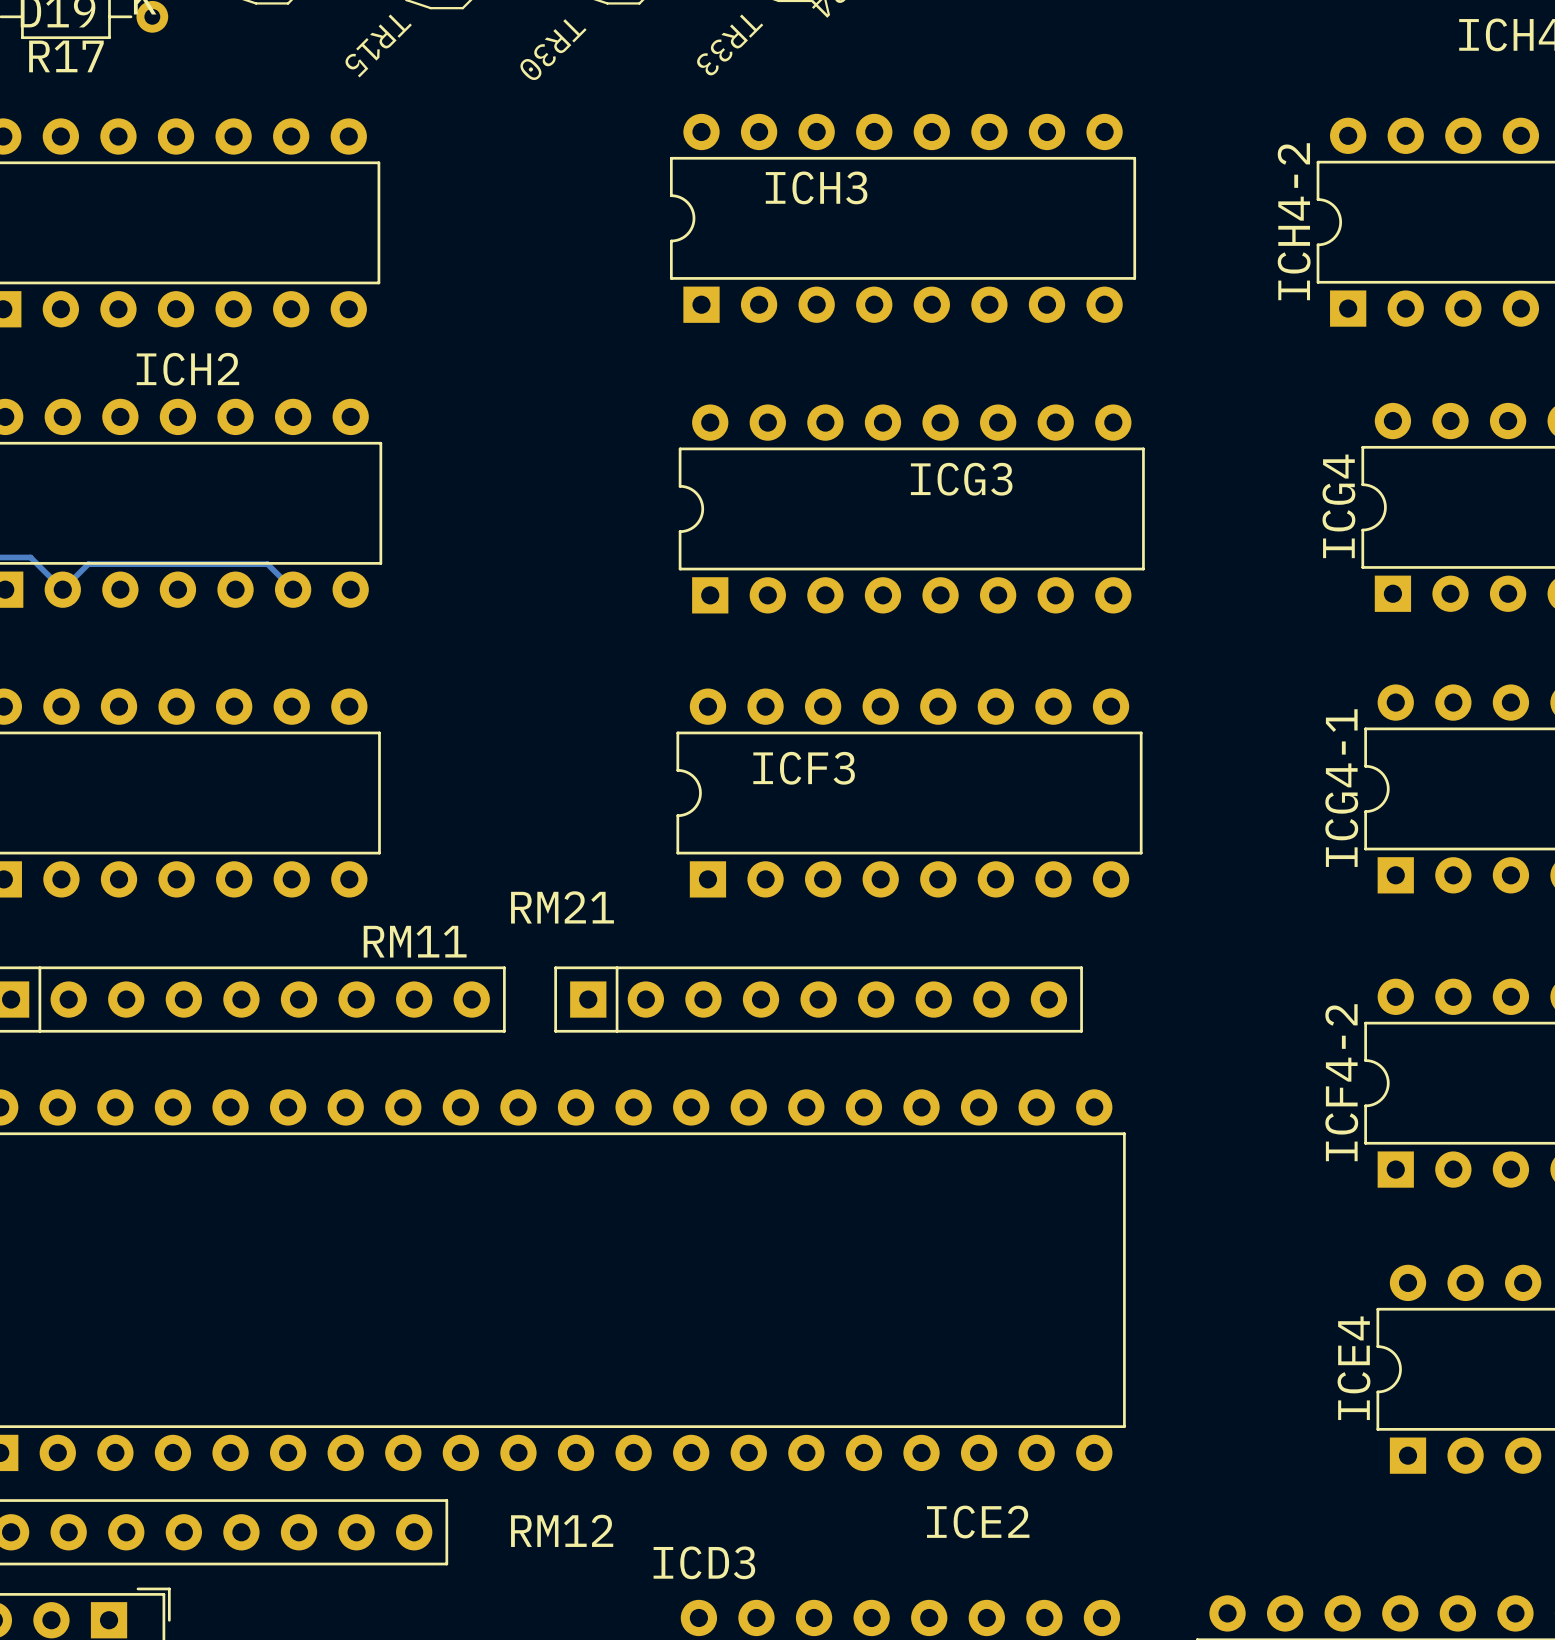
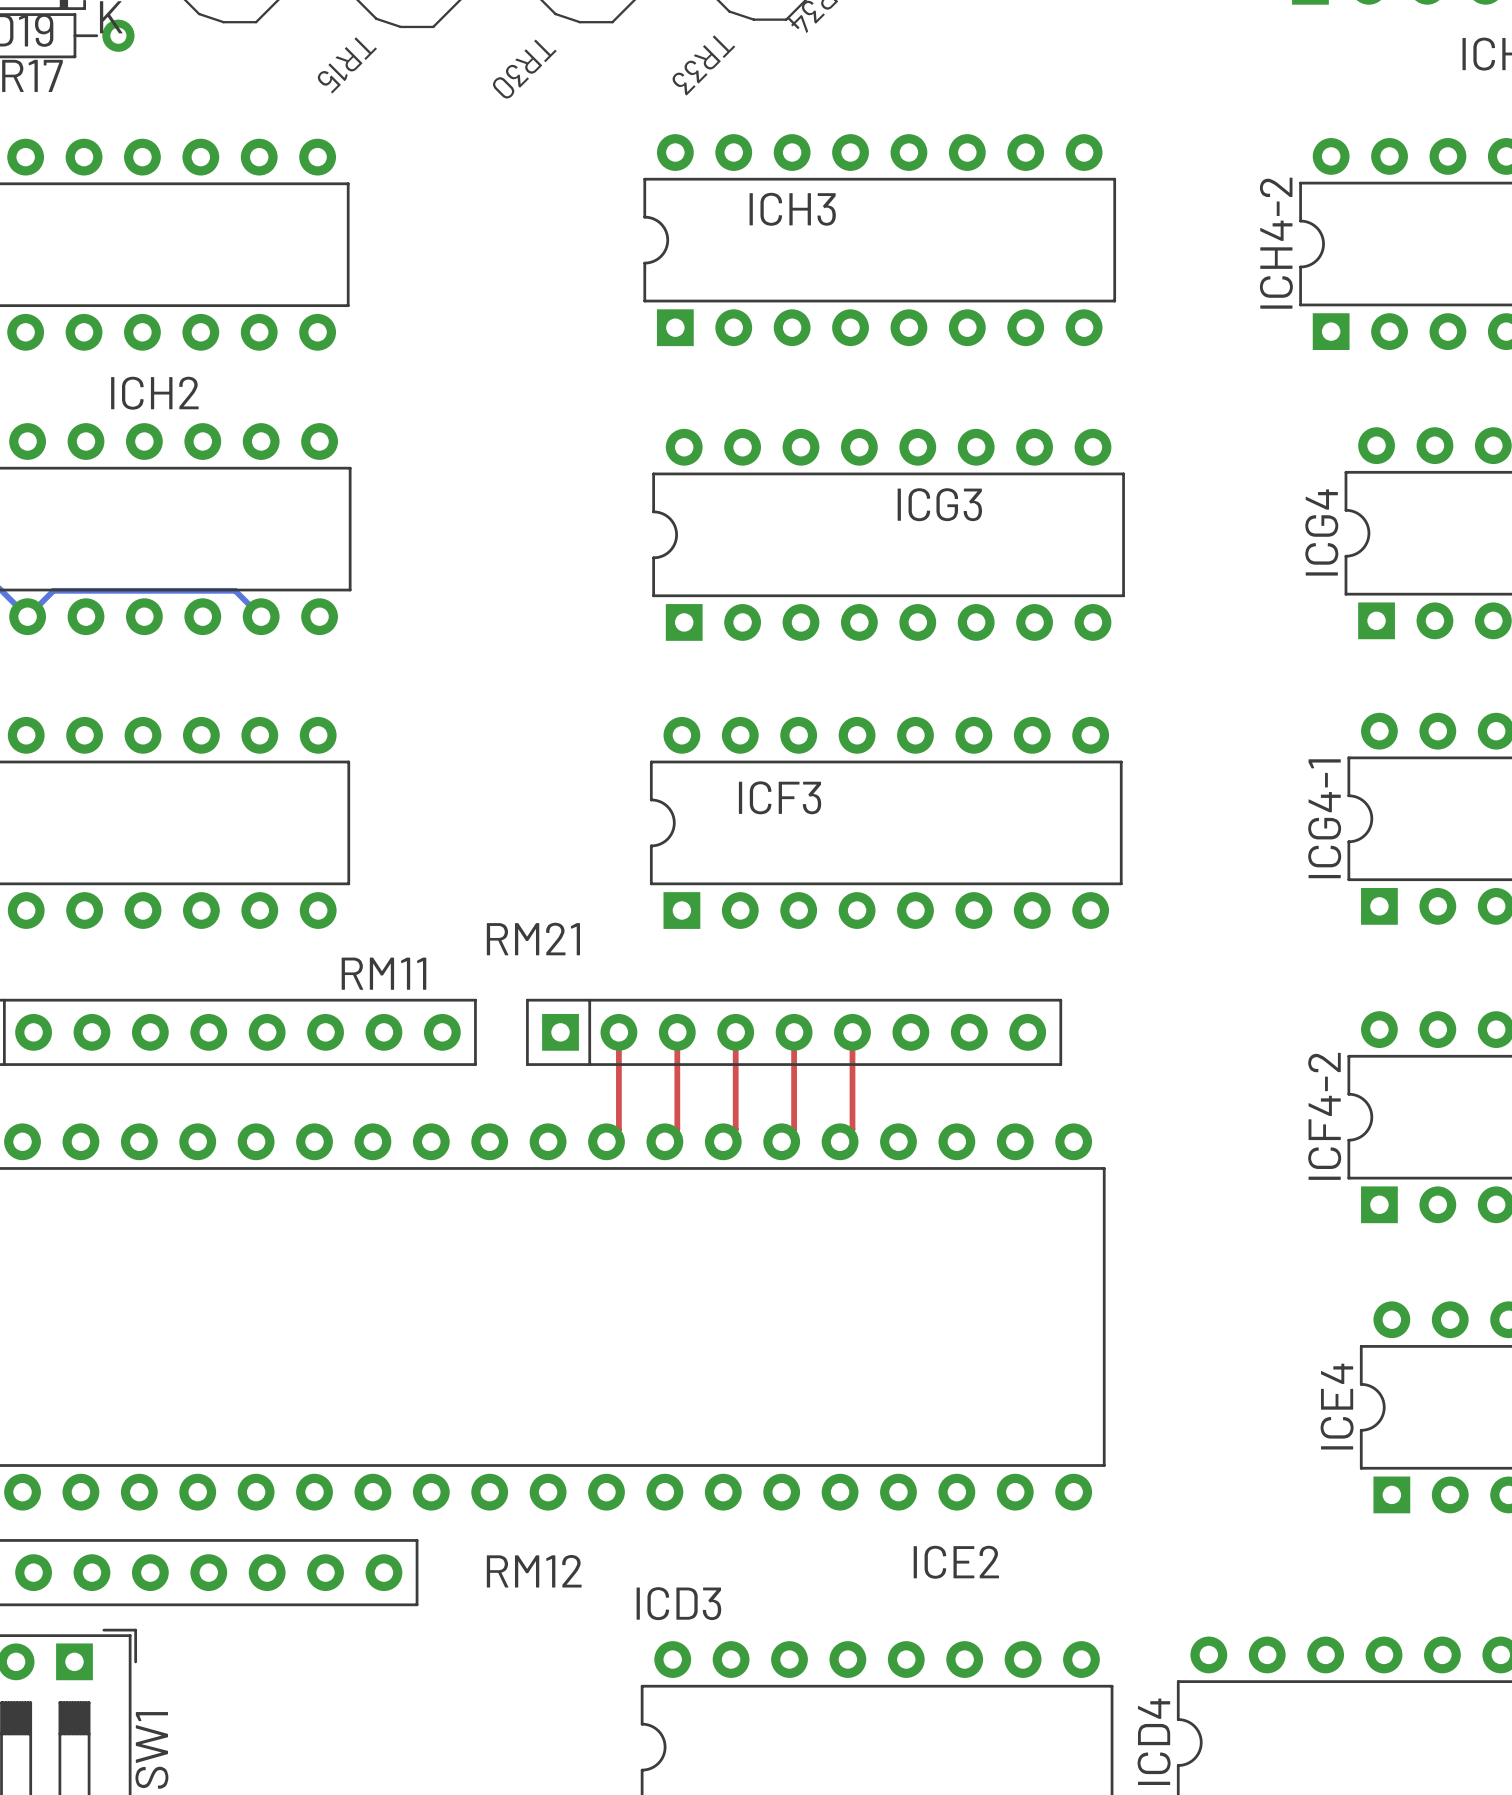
top track: none -> (618, 1032) (618, 1129) (606, 1141)
top track: none -> (677, 1032) (677, 1129) (664, 1141)
top track: none -> (735, 1032) (735, 1129) (723, 1141)
top track: none -> (794, 1032) (794, 1129) (781, 1141)
top track: none -> (852, 1032) (852, 1129) (840, 1141)

